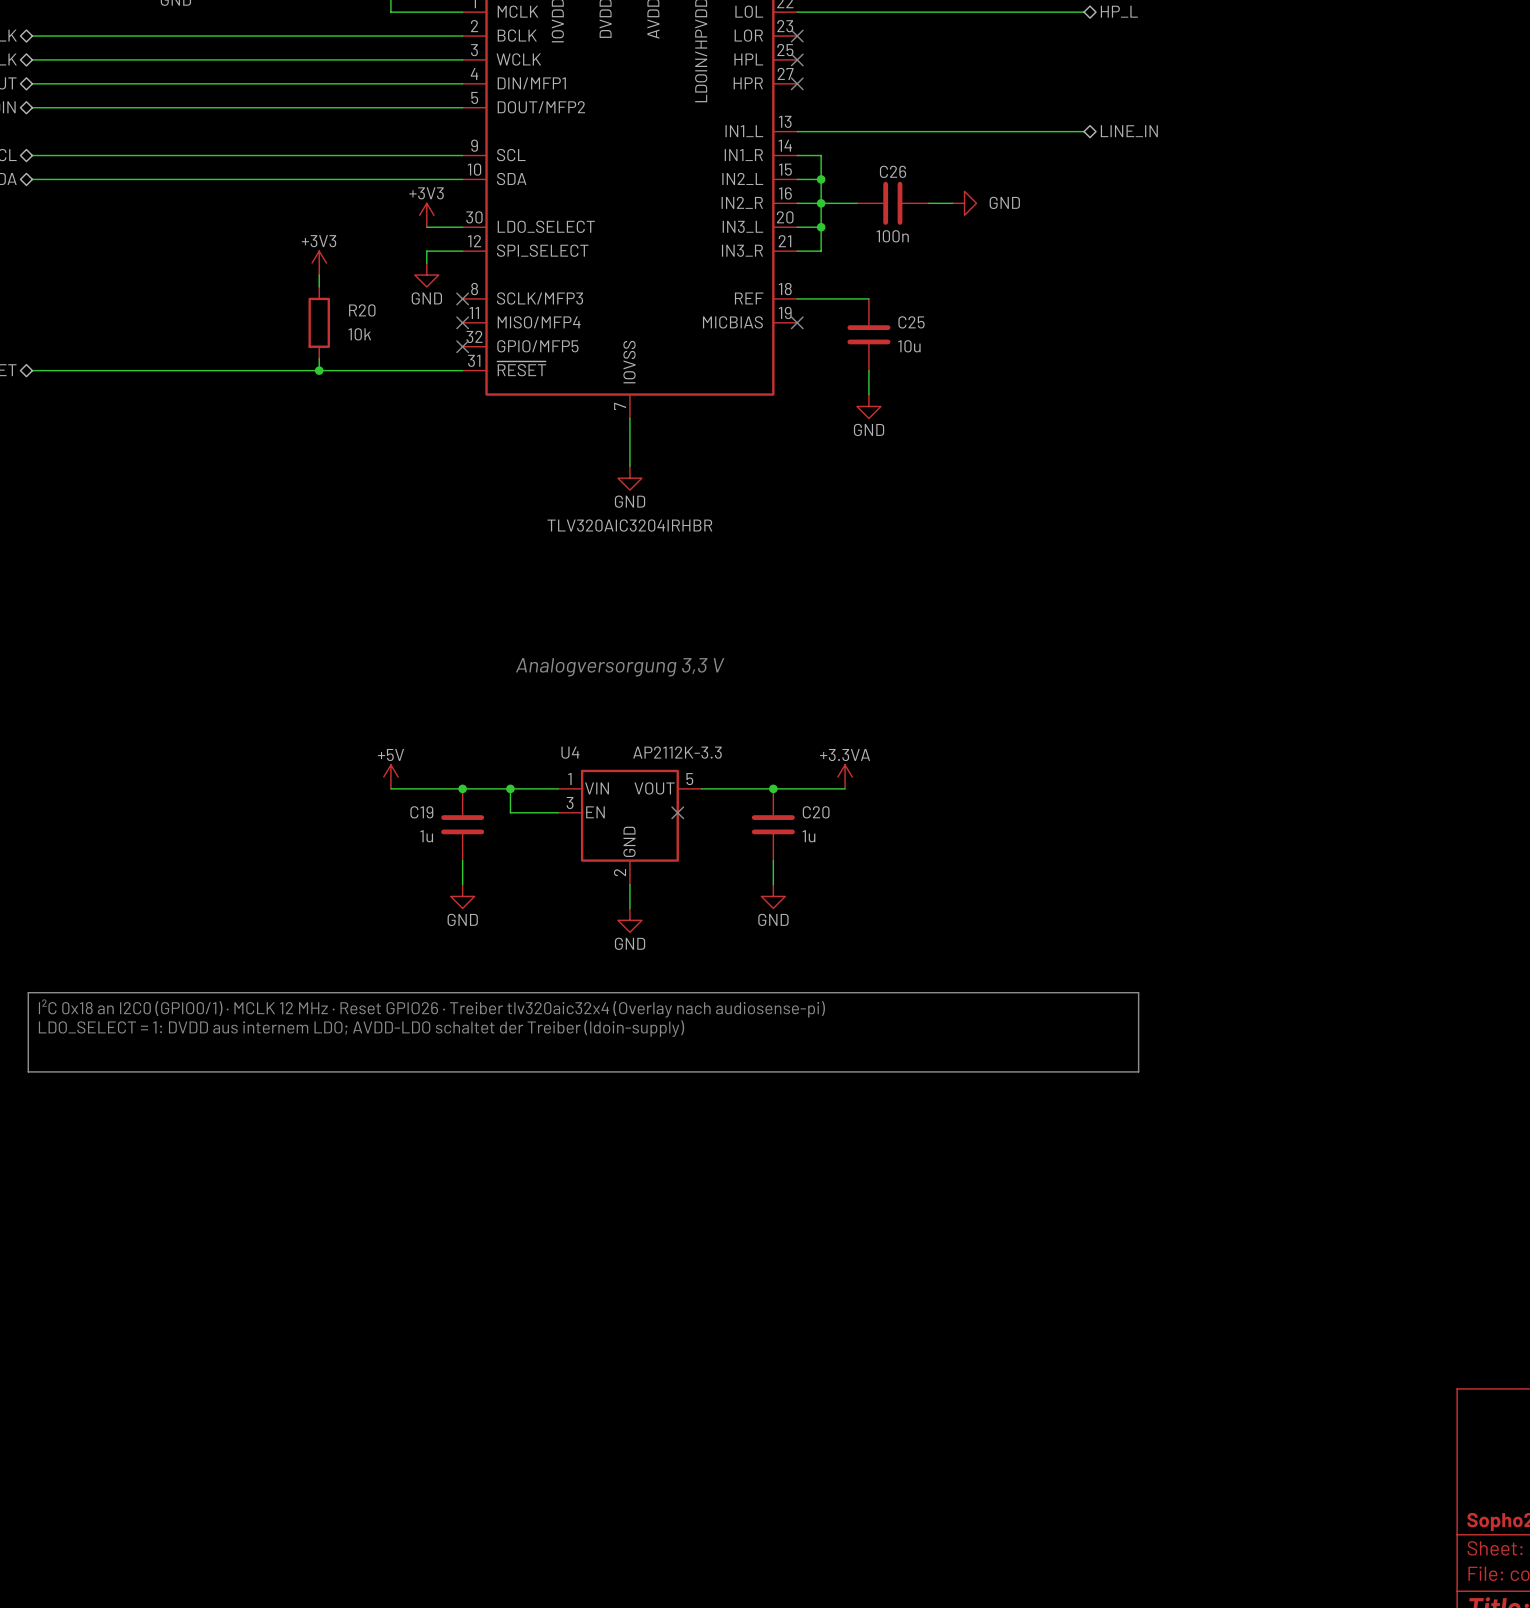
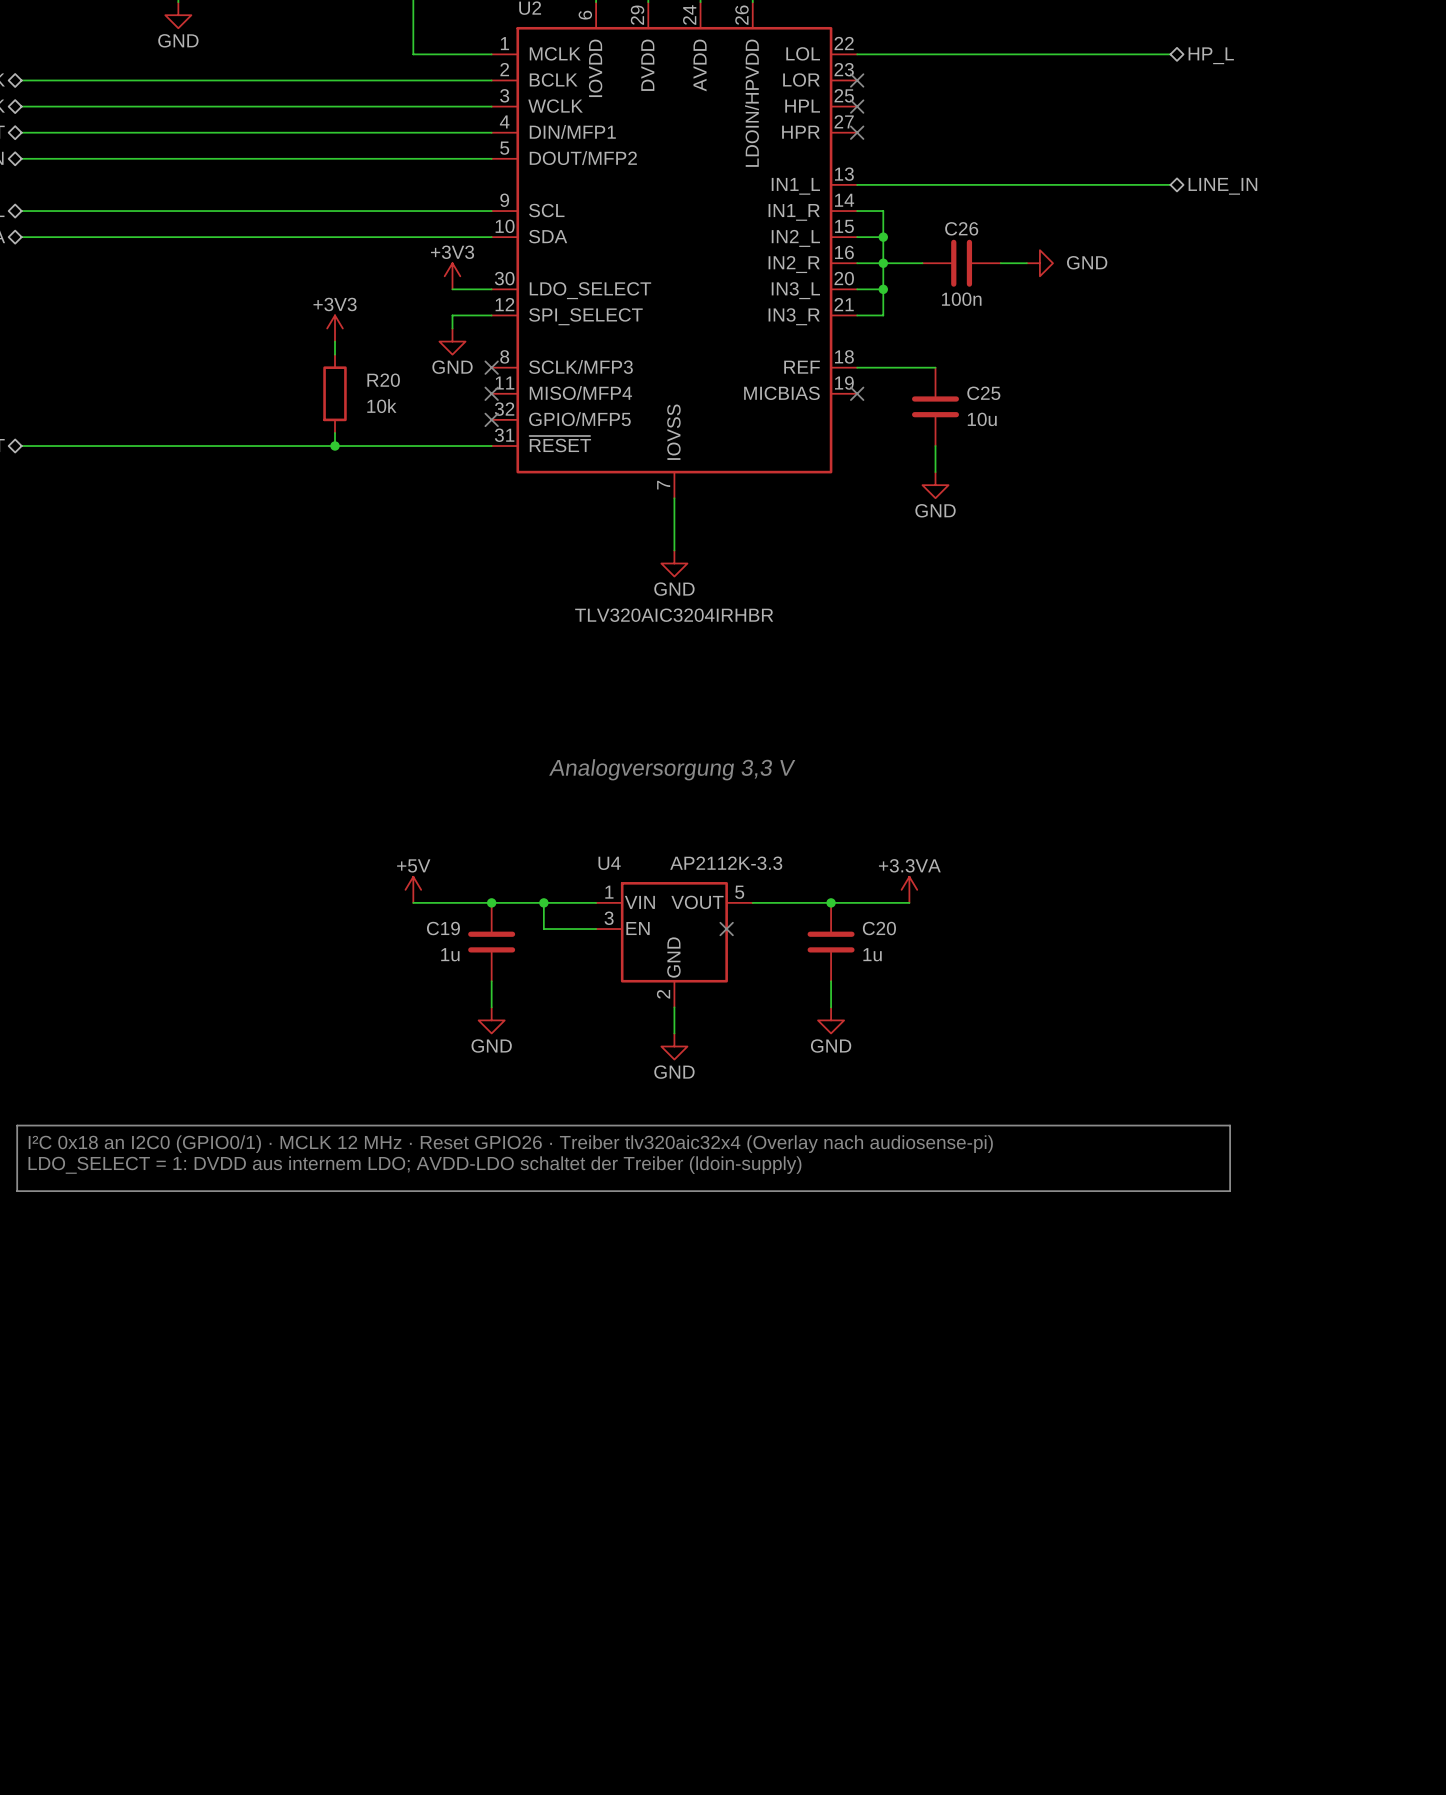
line: (28, 1052) (28, 1071) (1138, 1071) (1138, 1052) -> (17, 1191) (1230, 1191)

